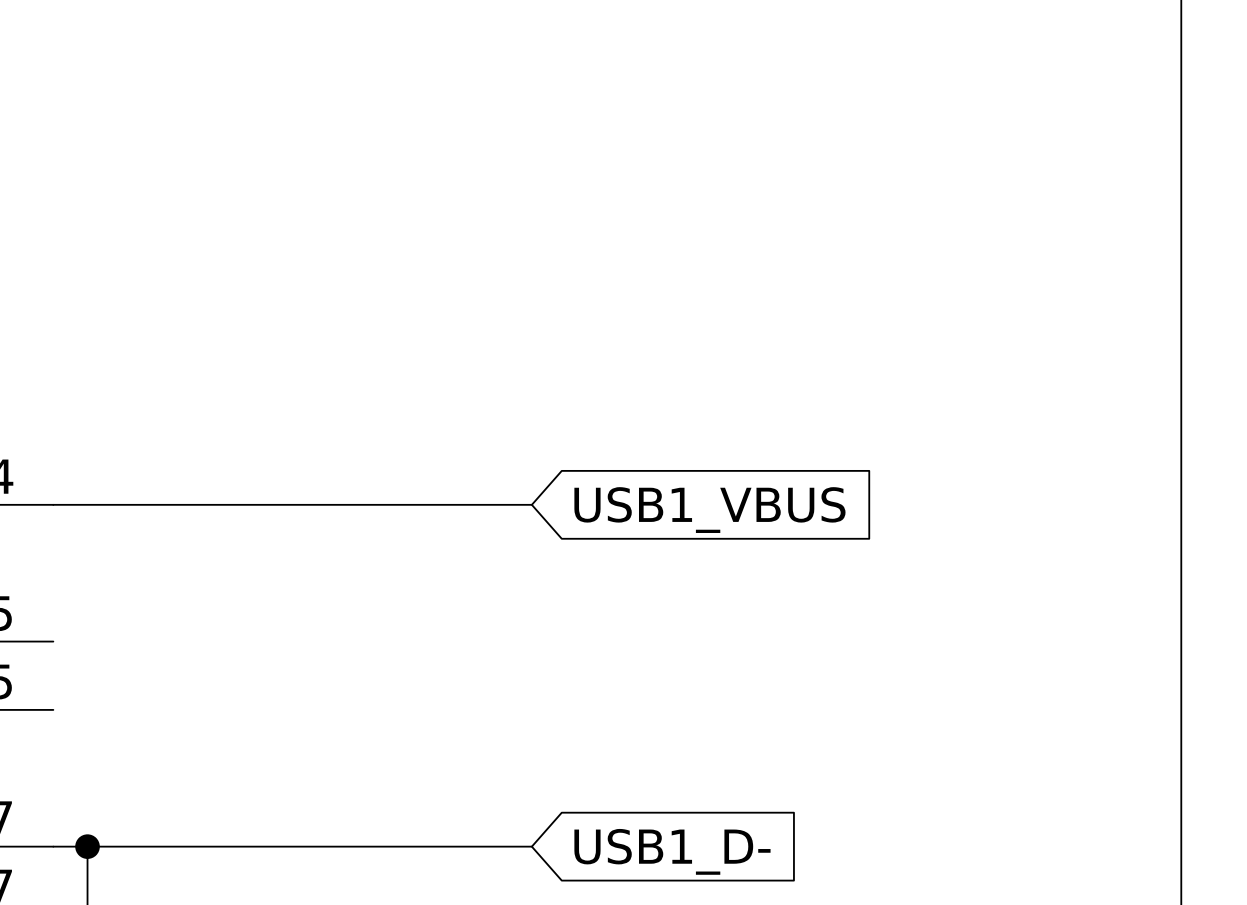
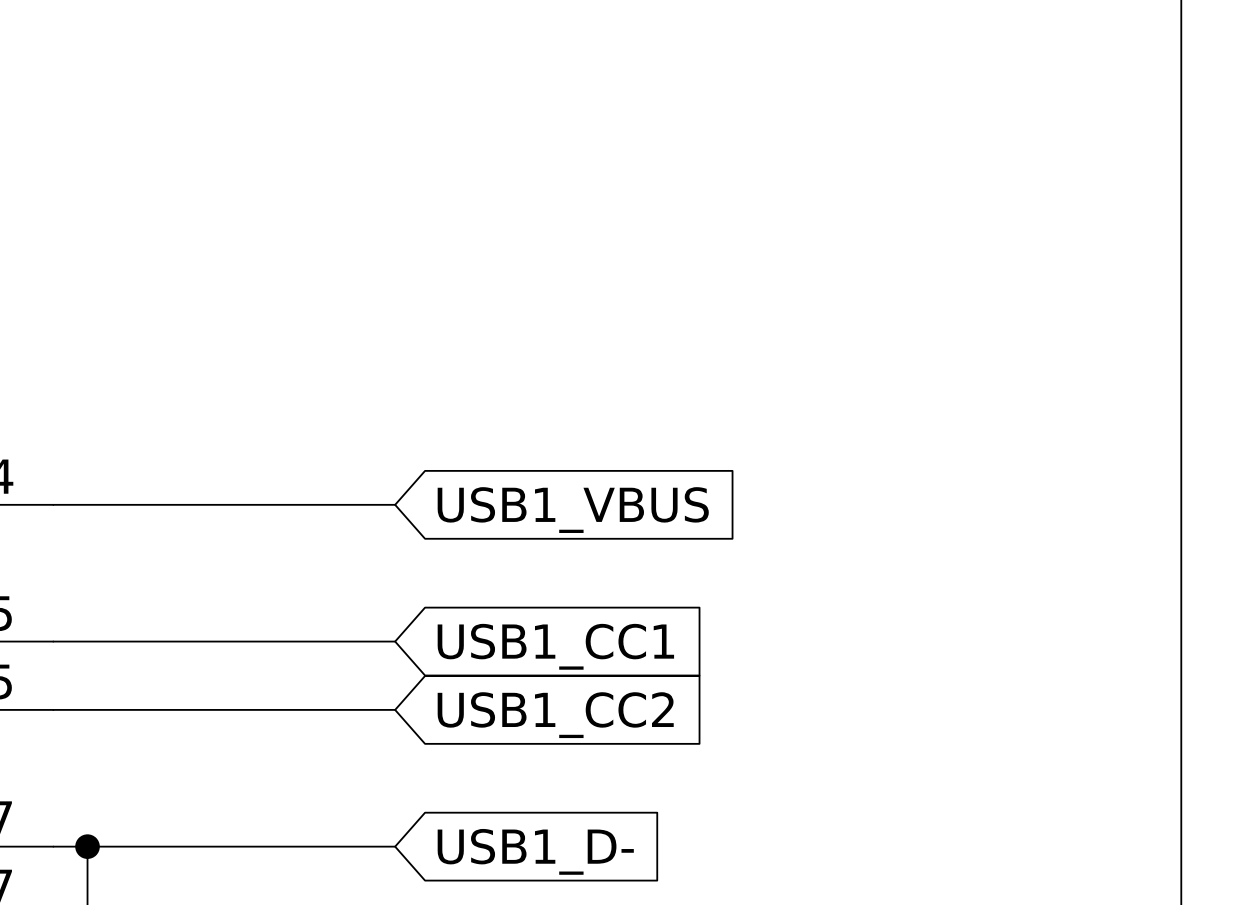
wire: (395, 504) (531, 504) -> none
global label position: USB1_VBUS (709, 510) -> USB1_VBUS (573, 510)
wire: none -> (53, 641) (395, 641)
global label: none -> USB1_CC1 (555, 646)
wire: none -> (53, 709) (395, 709)
global label: none -> USB1_CC2 (555, 715)
wire: (395, 846) (531, 846) -> none
global label position: USB1_D- (672, 851) -> USB1_D- (535, 851)

